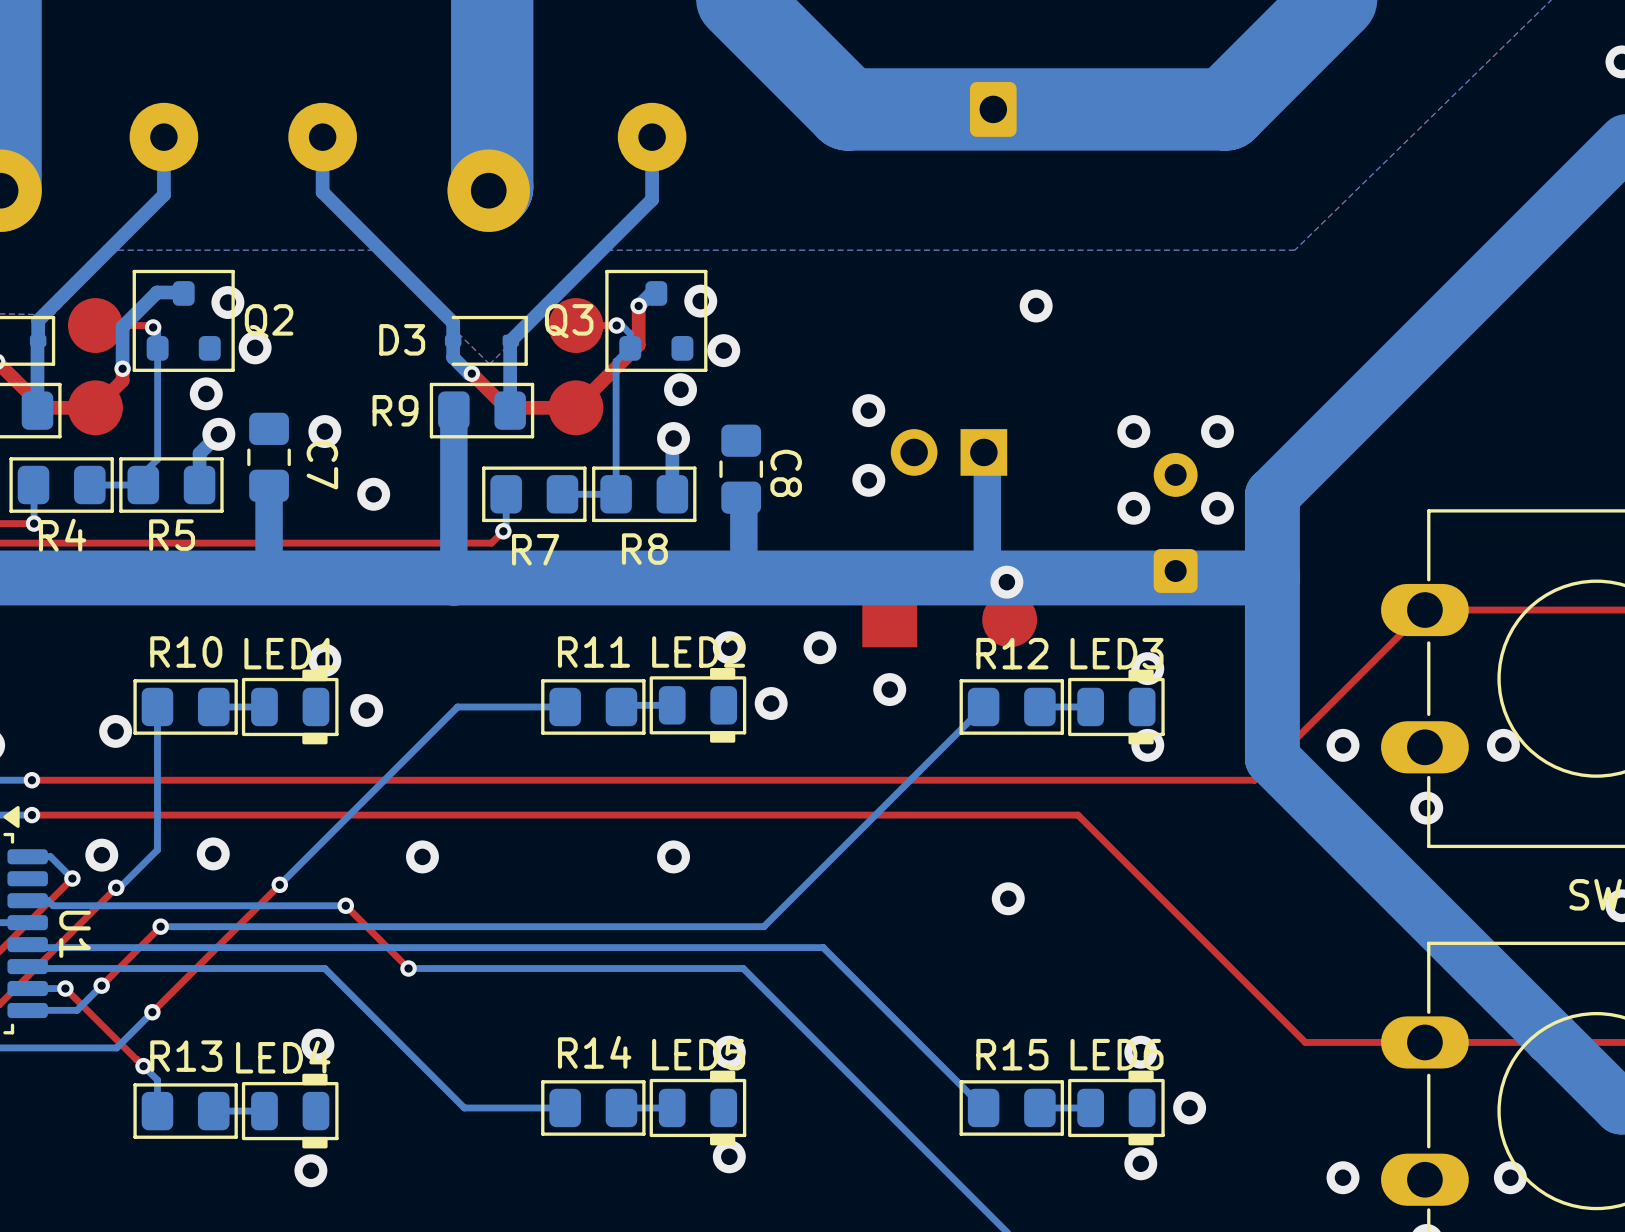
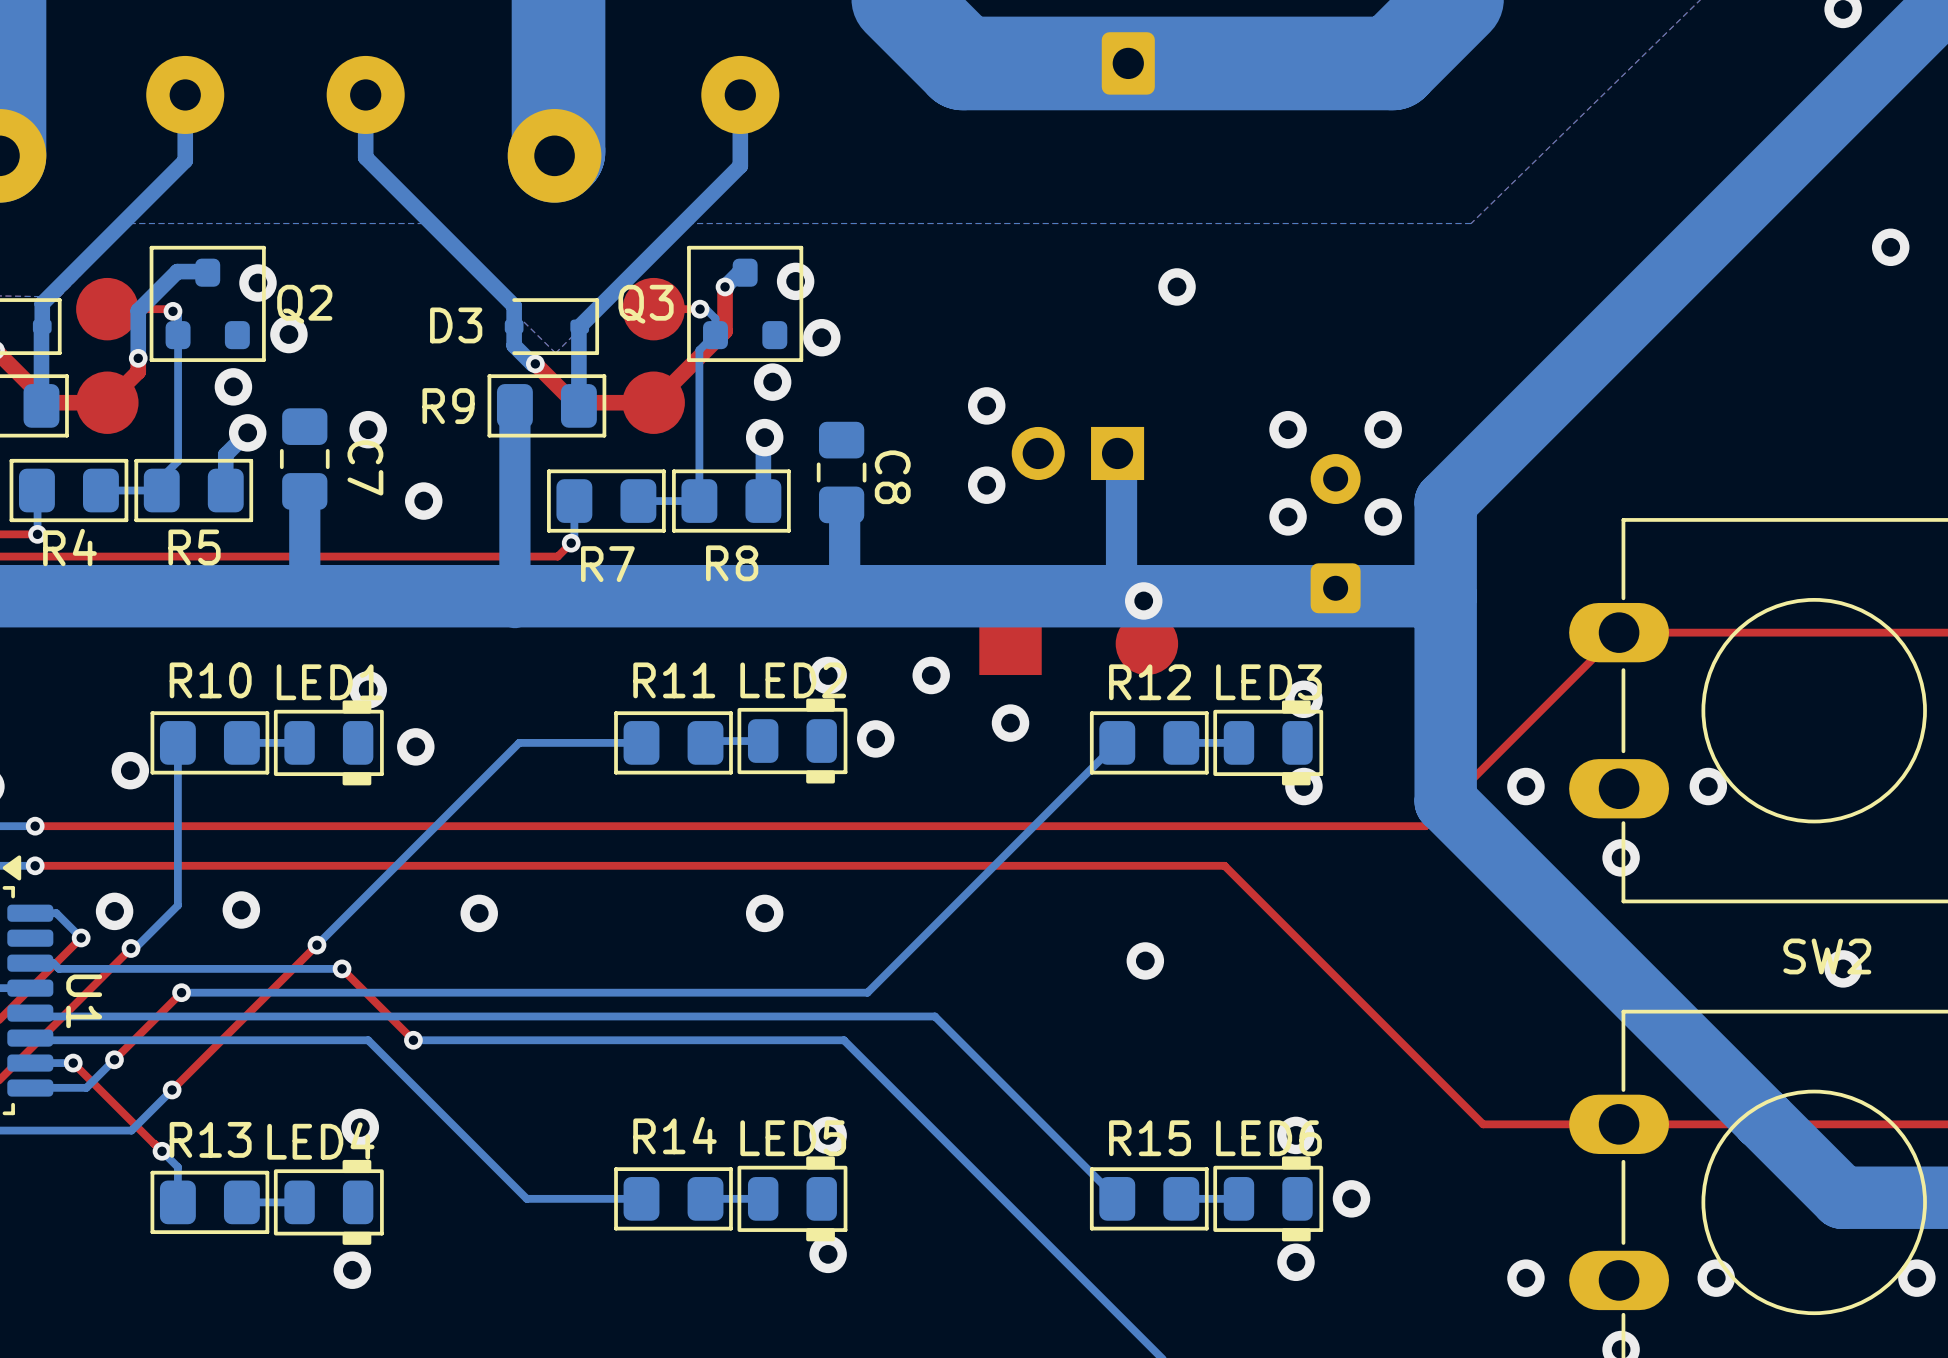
via: none -> (342, 968)
top track: (345, 905) (408, 968) -> (342, 968) (413, 1040)
bottom track: (345, 905) (301, 905) -> (463, 1040) (413, 1040)
via: (345, 905) -> none
via: none -> (413, 1040)
via: (408, 968) -> none

